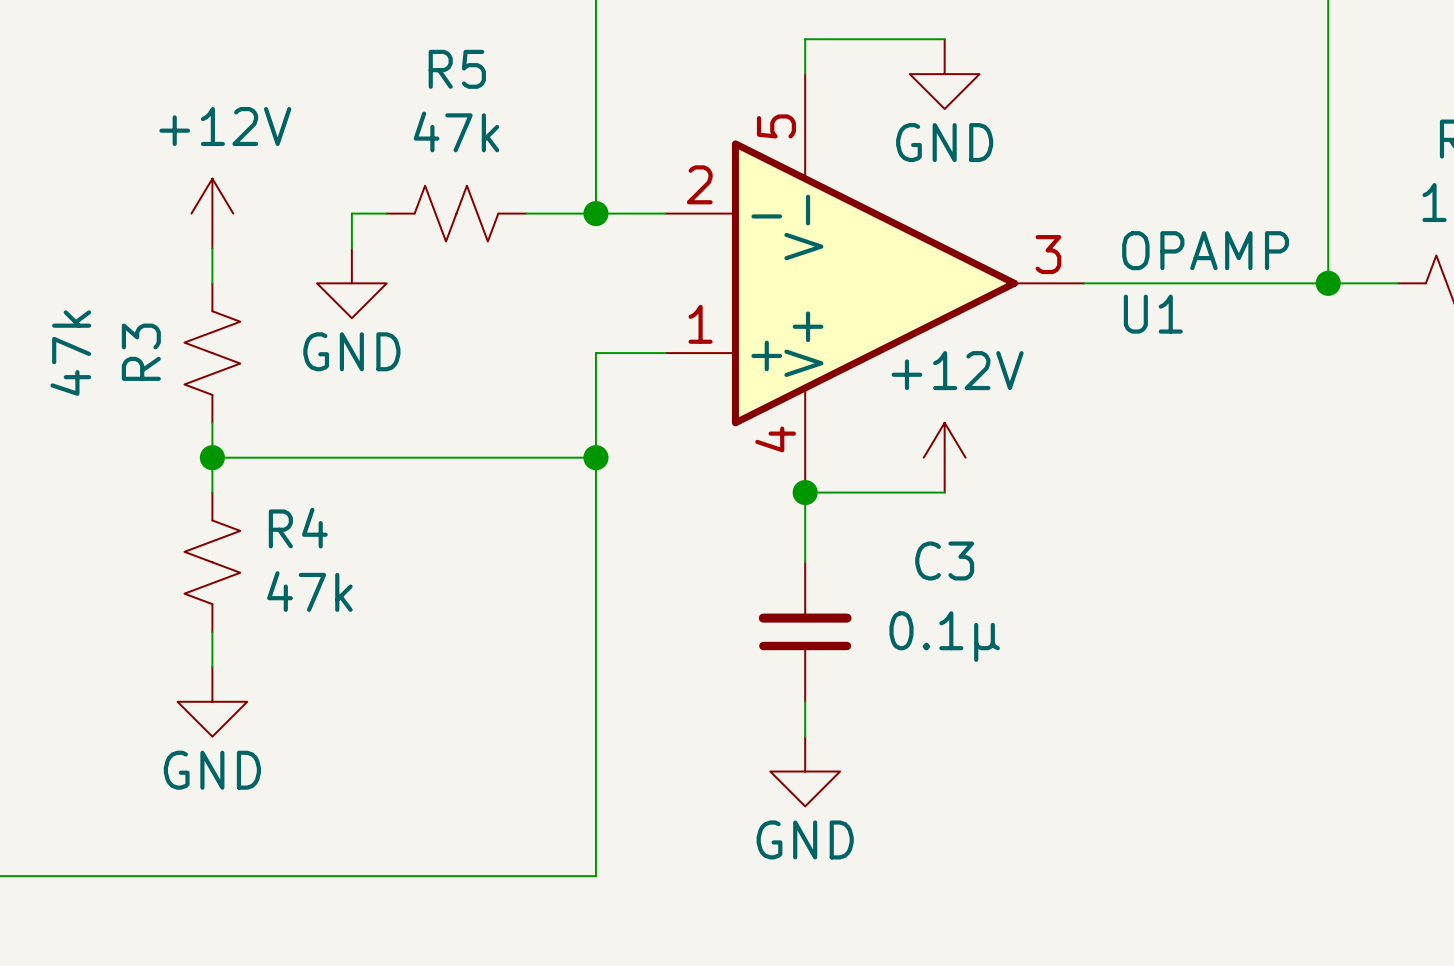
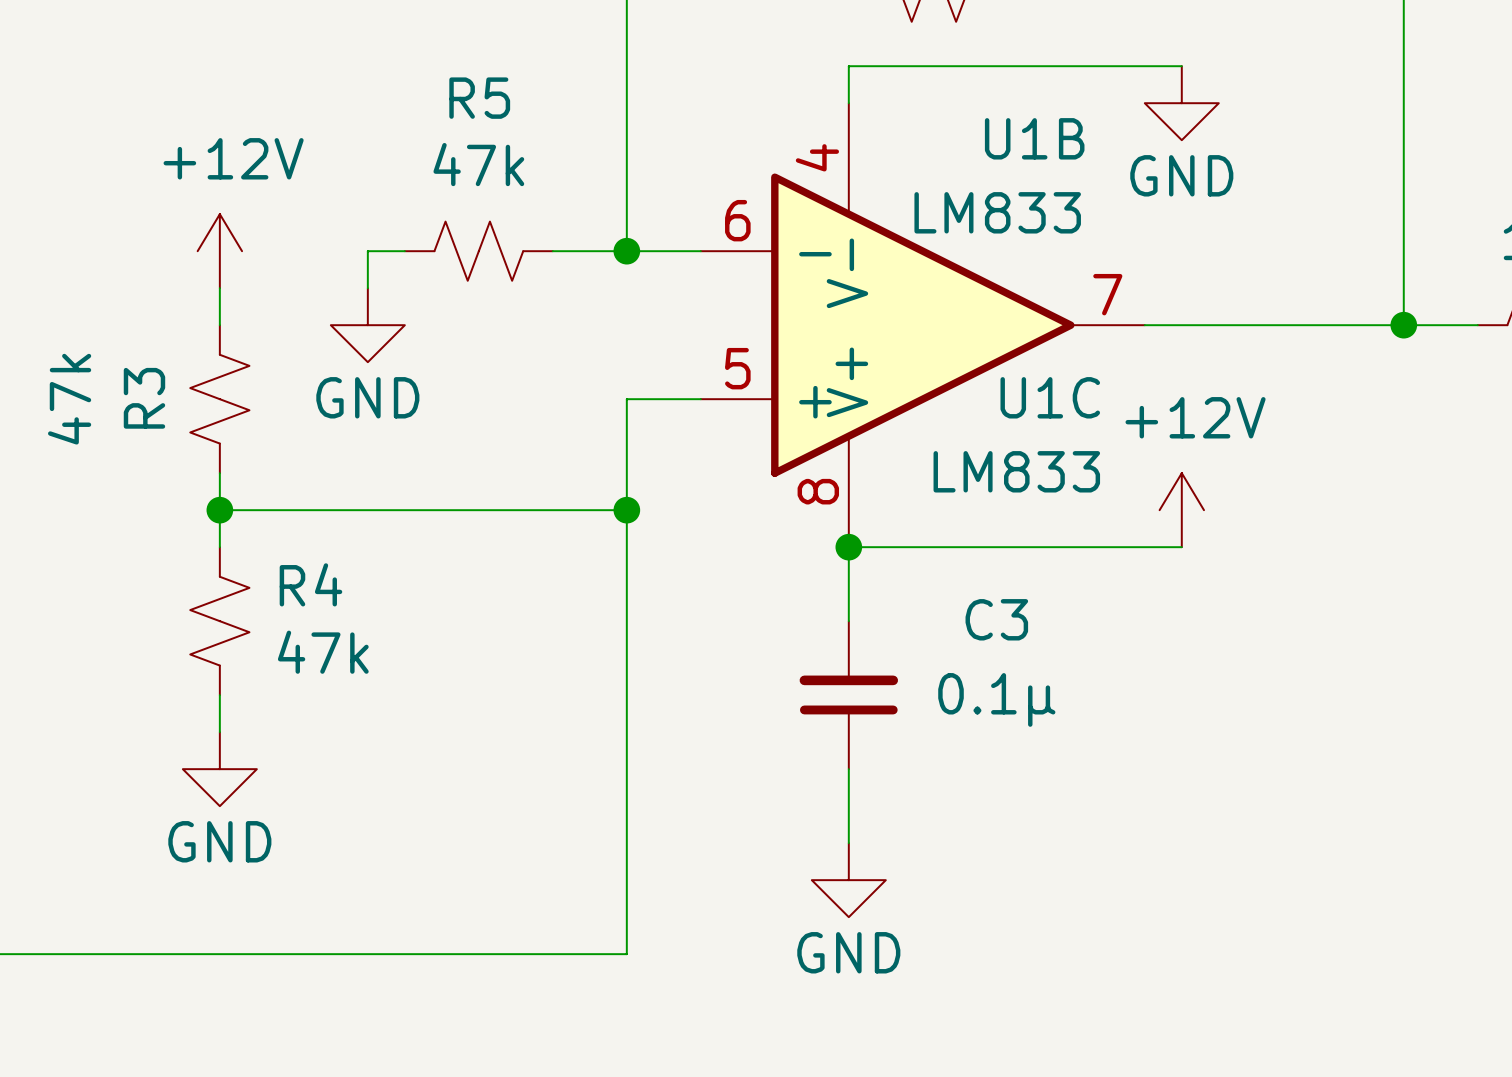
wire: none -> (996, 66) (1181, 66)
power symbol position: GND (944, 74) -> GND (1181, 103)
U1C: none -> LM833 (848, 325)
U1: OPAMP (874, 283) -> none
U1B: none -> LM833 (922, 325)
power symbol position: +12V (944, 457) -> +12V (1181, 510)
wire: none -> (996, 547) (1181, 547)
power symbol position: GND (805, 771) -> GND (848, 880)

